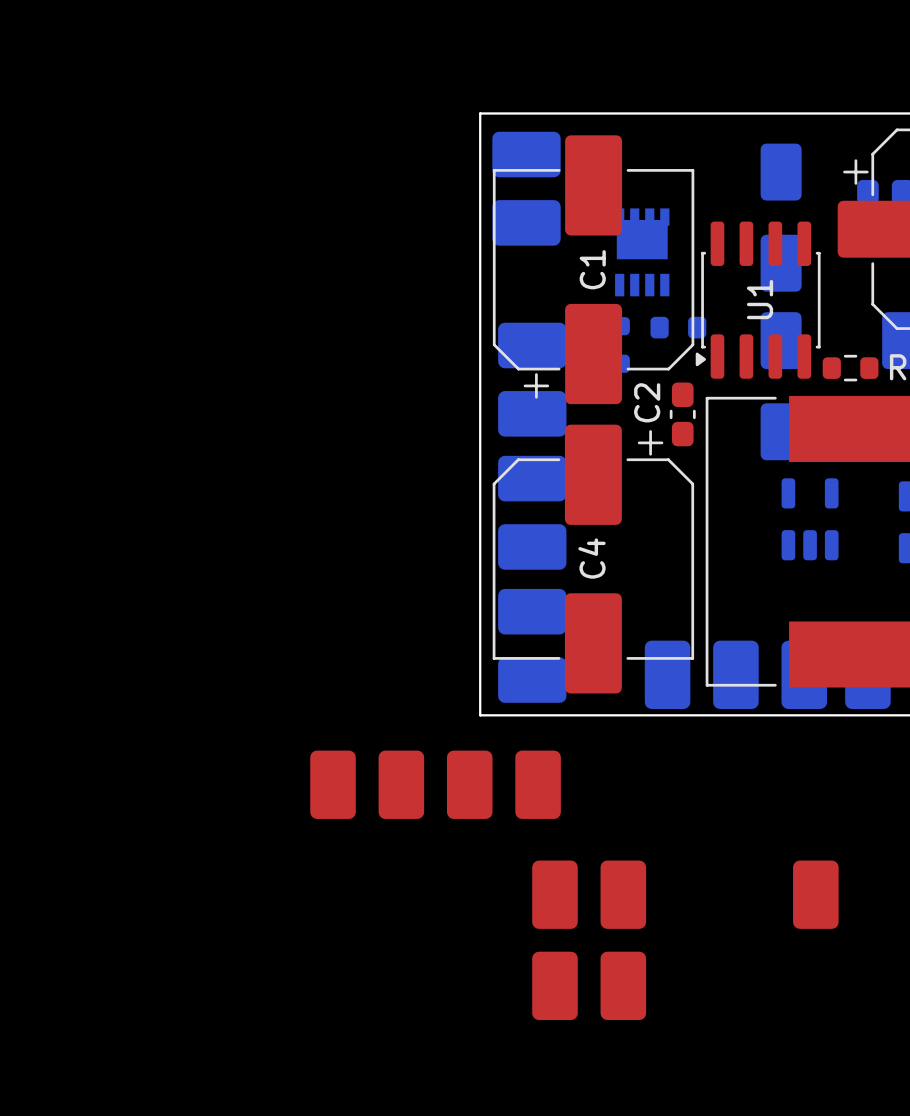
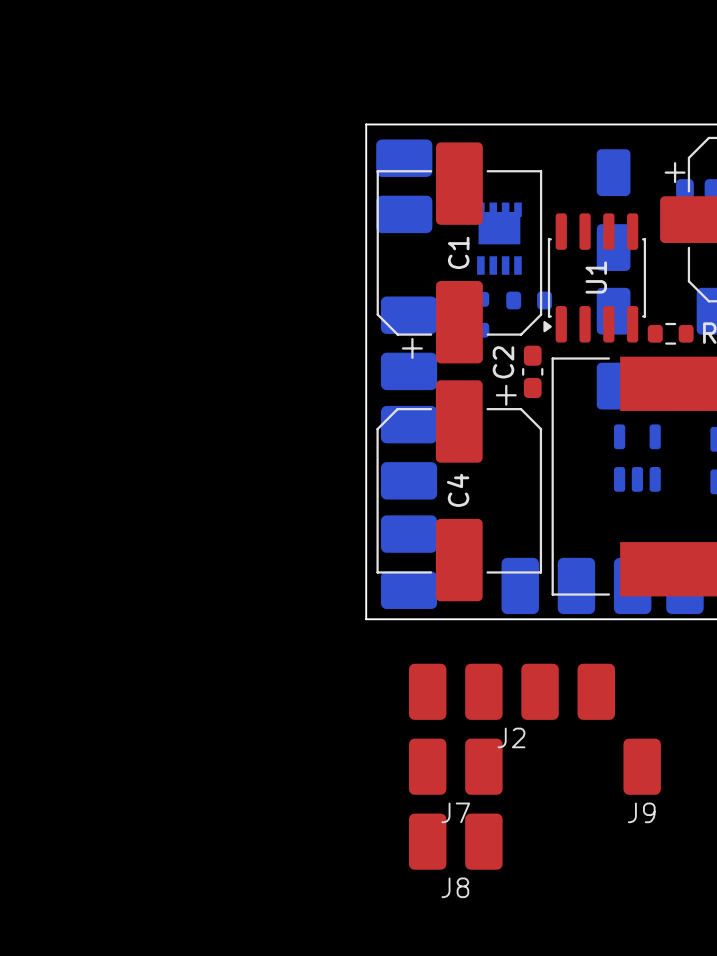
part: (435, 784) -> none
J2: none -> (511, 691)
J7 name: none -> J7 (455, 812)
J9 name: none -> J9 (641, 812)
J8 name: none -> J8 (455, 887)

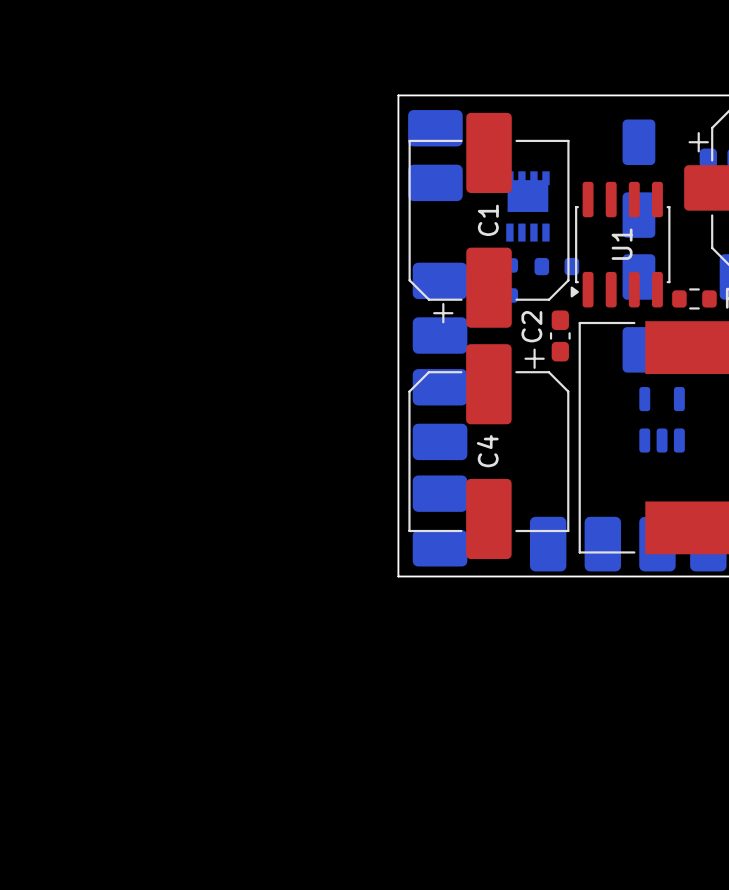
J2: (511, 691) -> none
J7: (455, 766) -> none
J9: (642, 766) -> none
J8: (455, 841) -> none

